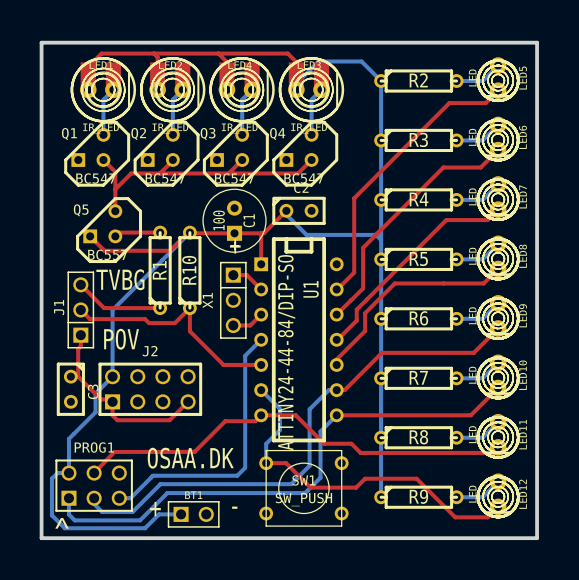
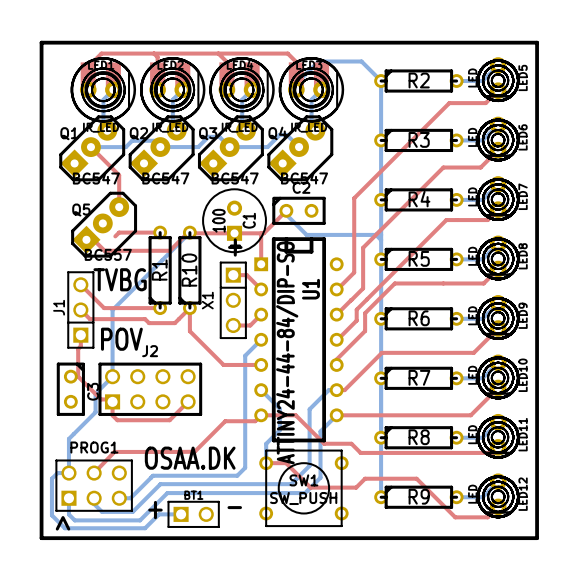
Q1 footprint: [64, 120, 131, 187] -> [59, 115, 126, 182]
Q2 footprint: [133, 120, 200, 187] -> [128, 115, 195, 182]
Q3 footprint: [202, 120, 269, 187] -> [197, 115, 264, 182]
Q4 footprint: [272, 120, 339, 187] -> [267, 115, 334, 182]
top track: none -> (91, 147) (119, 175) (119, 207)
bottom track: none -> (299, 147) (286, 134) (279, 134) (267, 147) (229, 147) (219, 136) (208, 136) (198, 147) (160, 147) (154, 140) (132, 140) (125, 147) (90, 147)
top track: (172, 159) (159, 173) -> none
top track: (242, 159) (228, 173) -> none
top track: (311, 159) (298, 173) (131, 173) (115, 189) -> none
top track: (103, 160) (115, 171) (115, 211) -> none
Q5 footprint: [76, 197, 143, 264] -> [71, 191, 138, 258]

